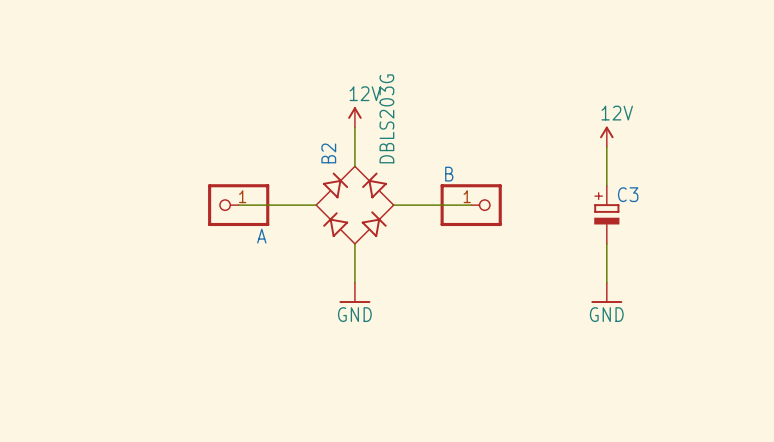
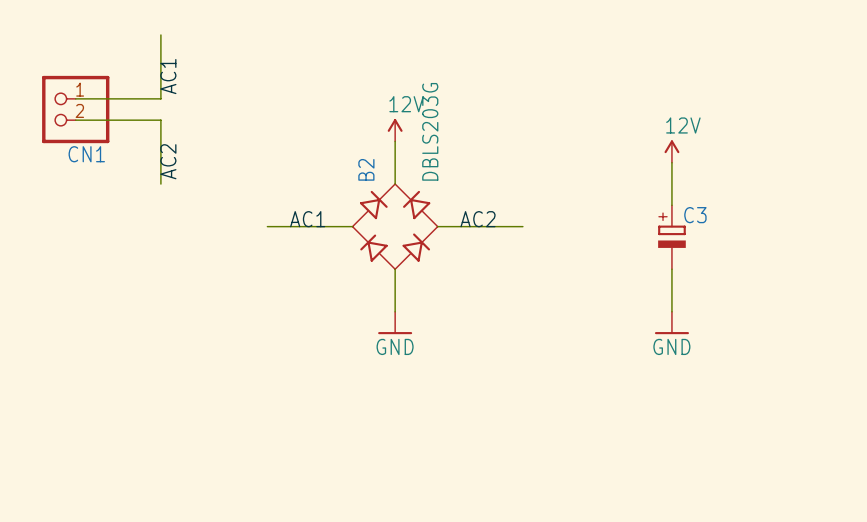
wire: none -> (160, 34) (160, 98) (75, 98)
label: none -> AC1 (168, 76)
CN1: none -> (75, 109)
wire: none -> (75, 120) (160, 120) (160, 184)
label: none -> AC2 (168, 161)
label: none -> AC1 (307, 219)
label: none -> AC2 (478, 219)
A: (238, 205) -> none
B: (471, 205) -> none

